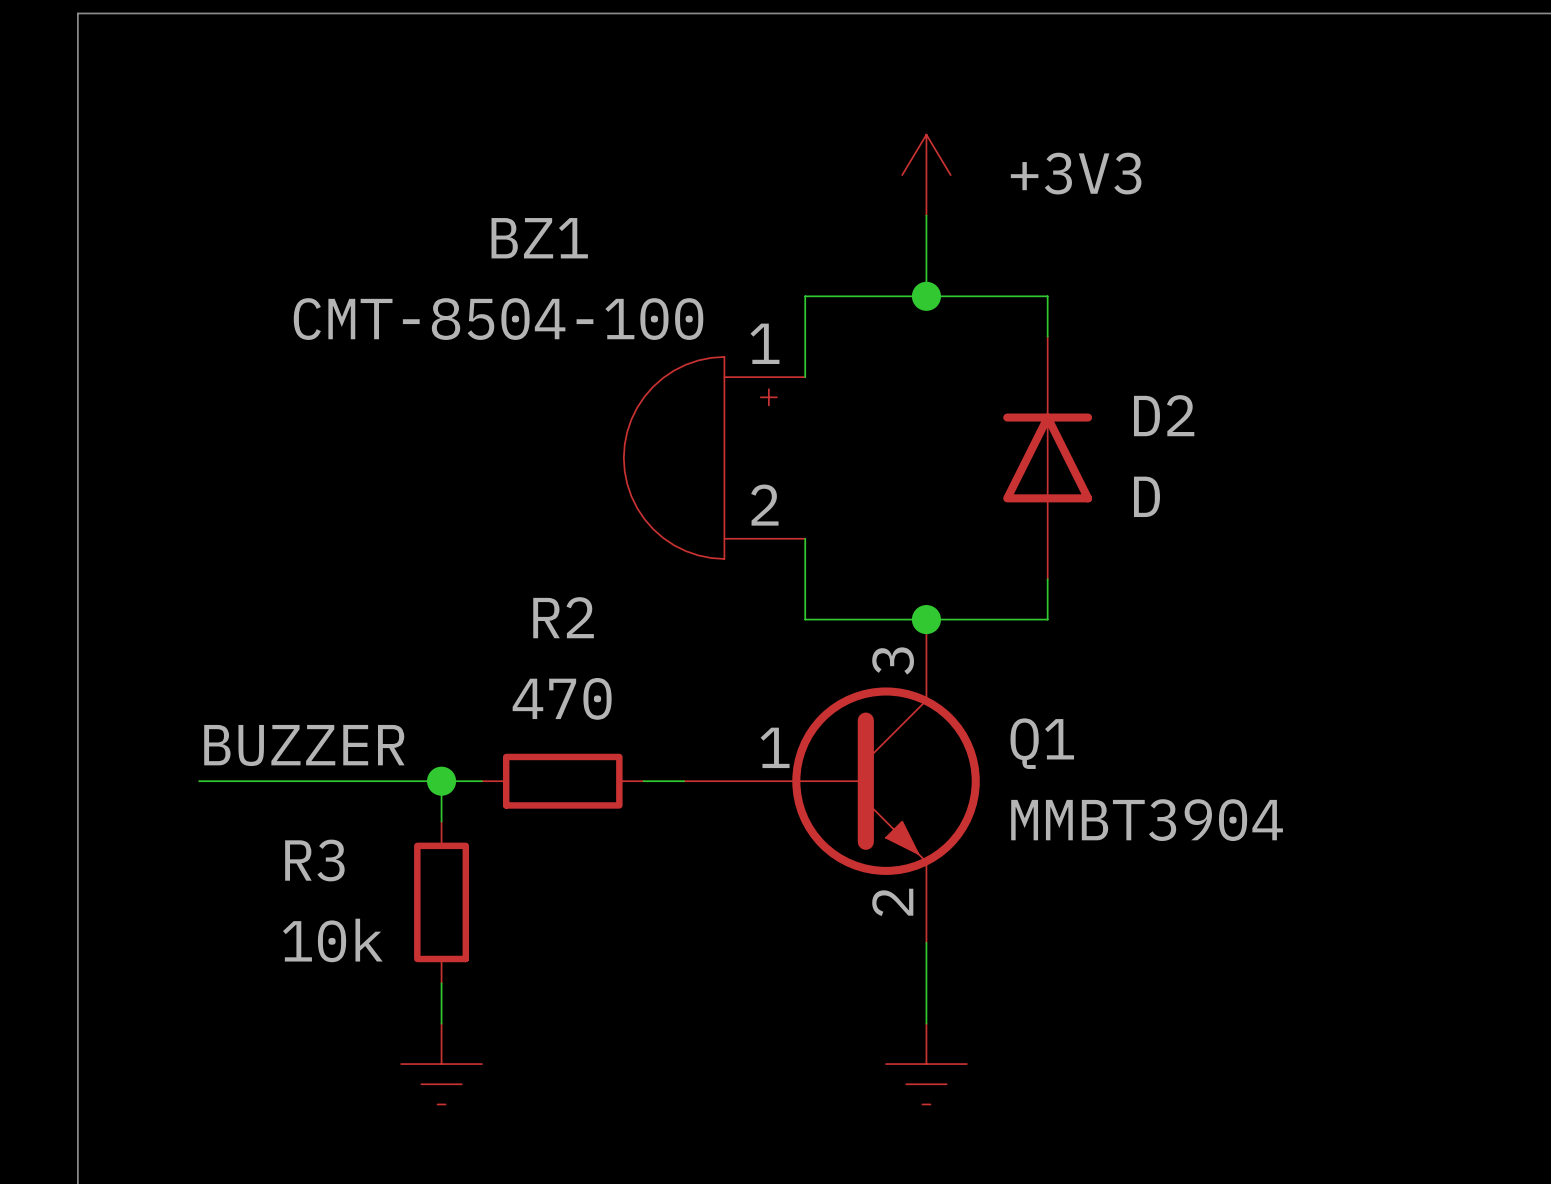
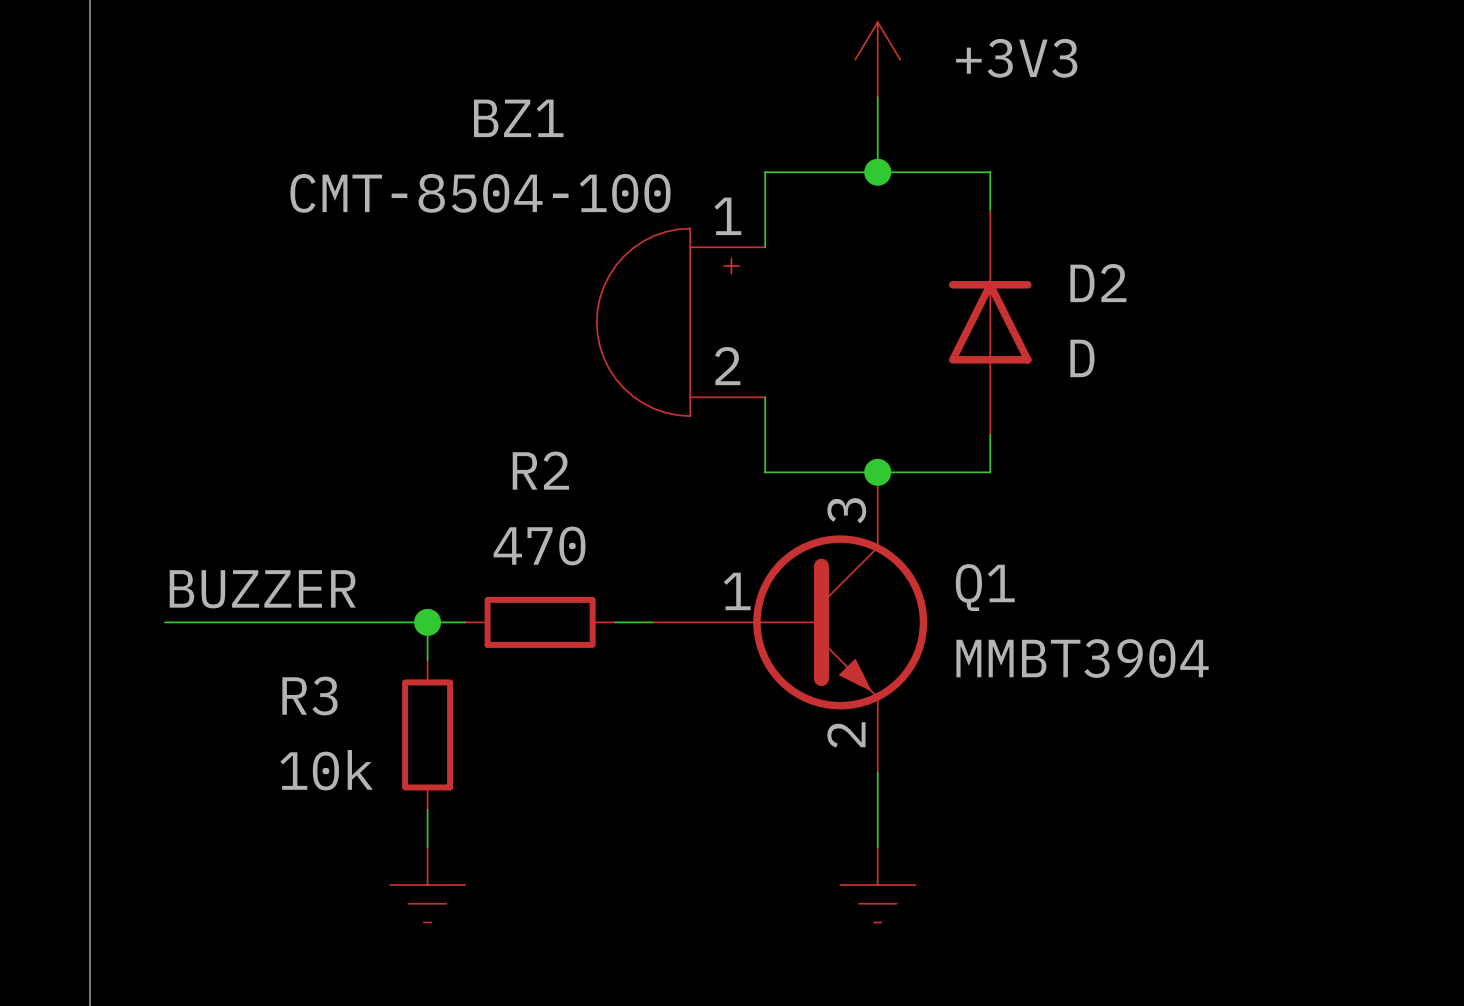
label position: BUZZER (304, 745) -> BUZZER (262, 589)
wire: none -> (165, 622) (202, 622)

